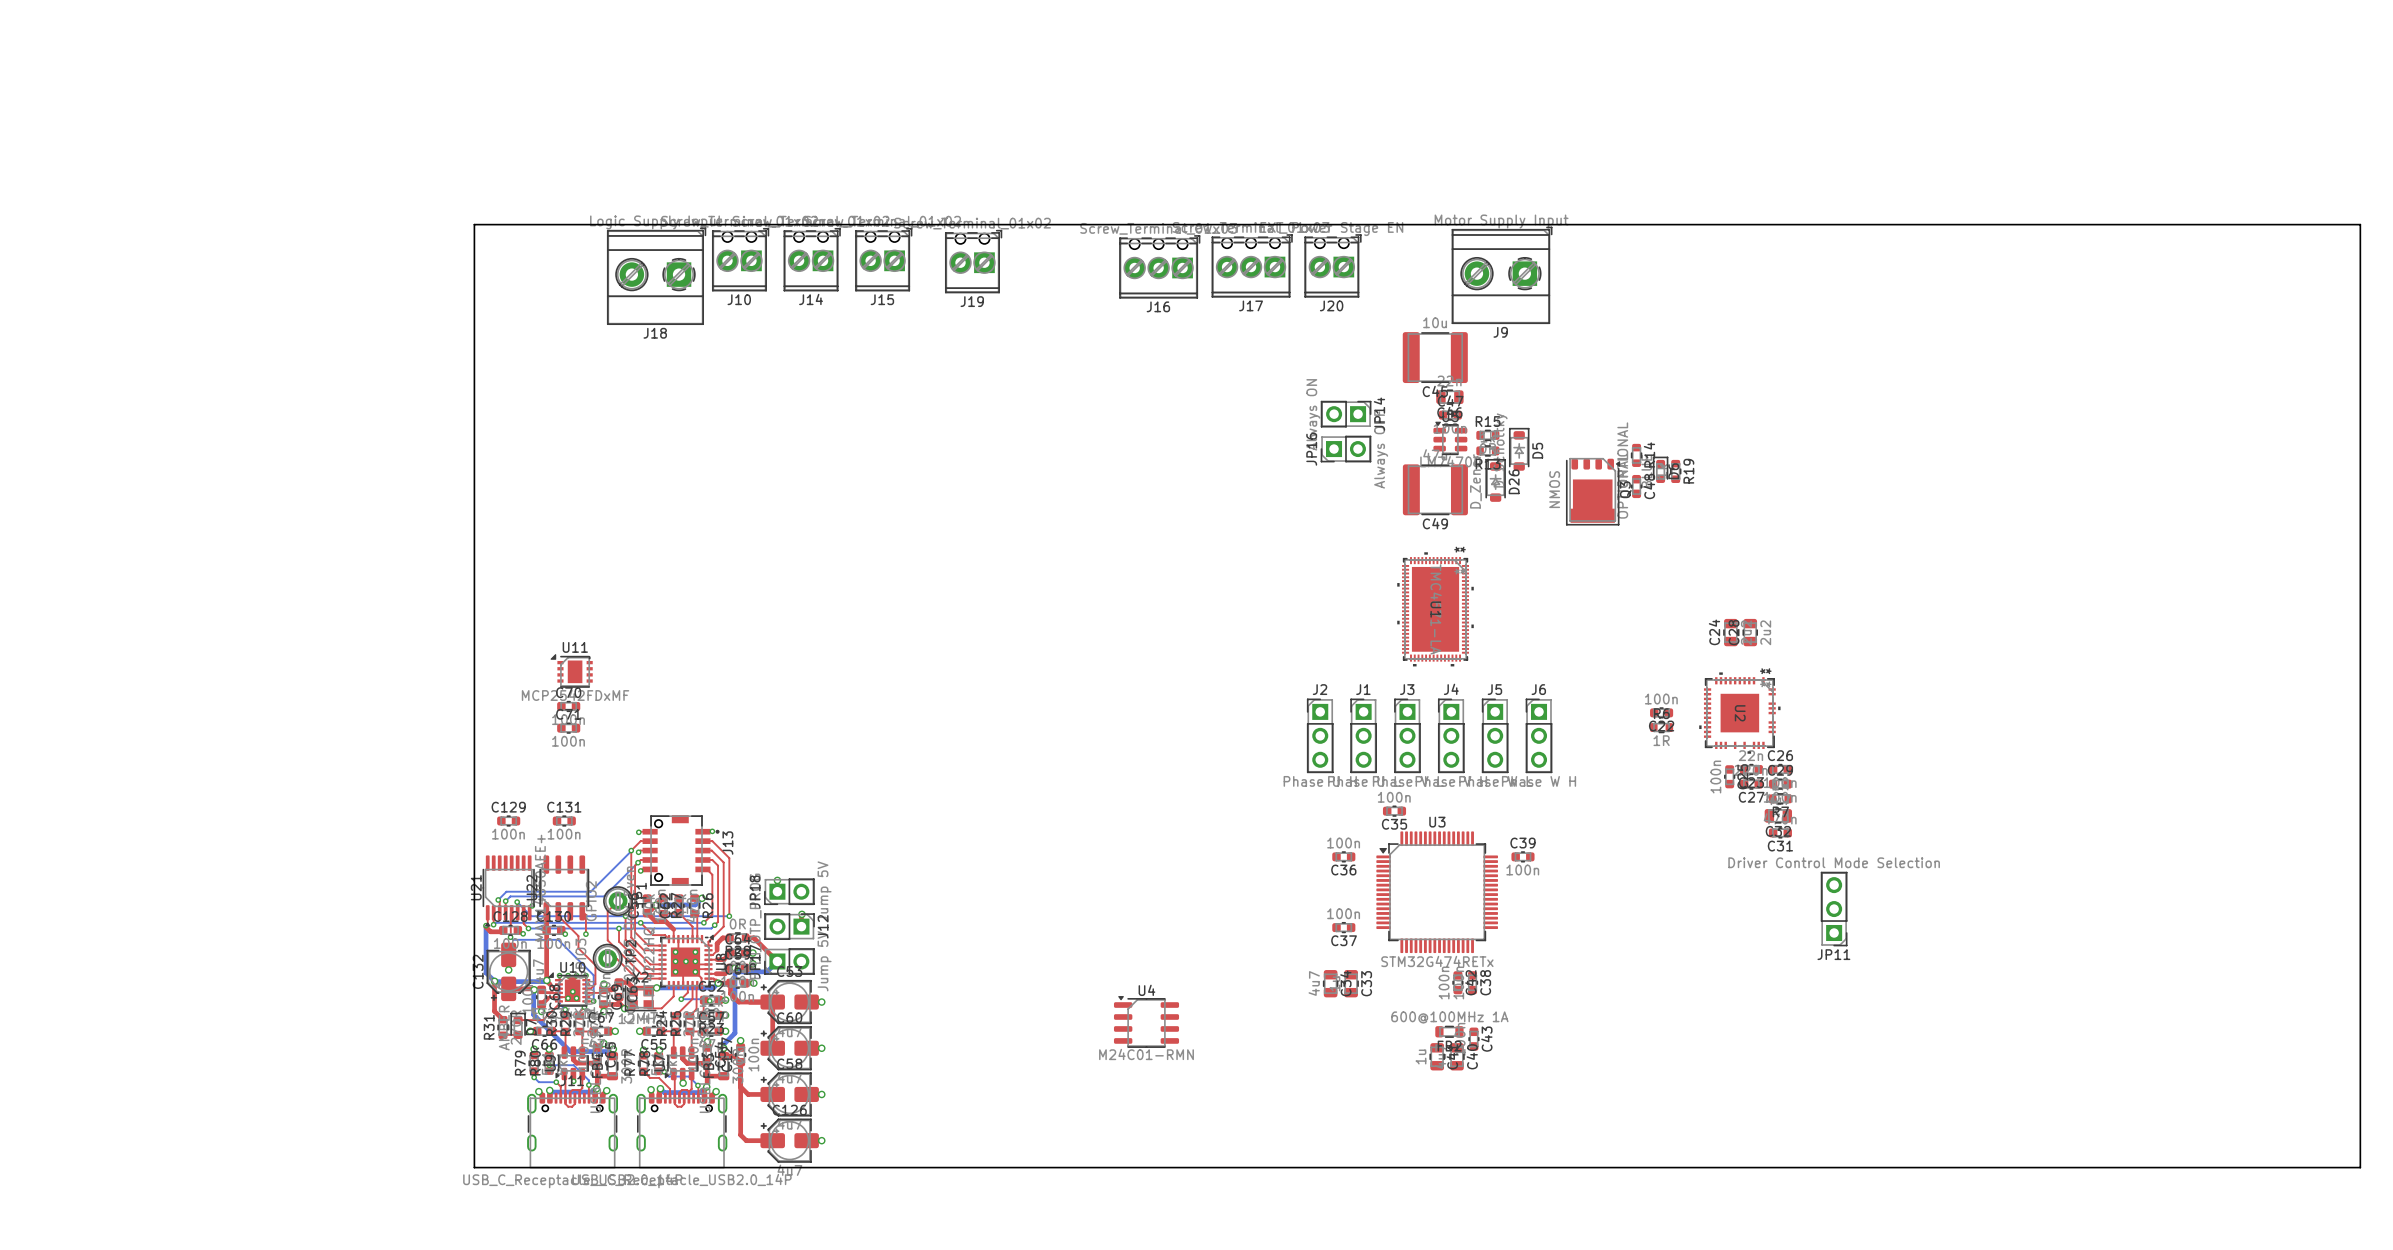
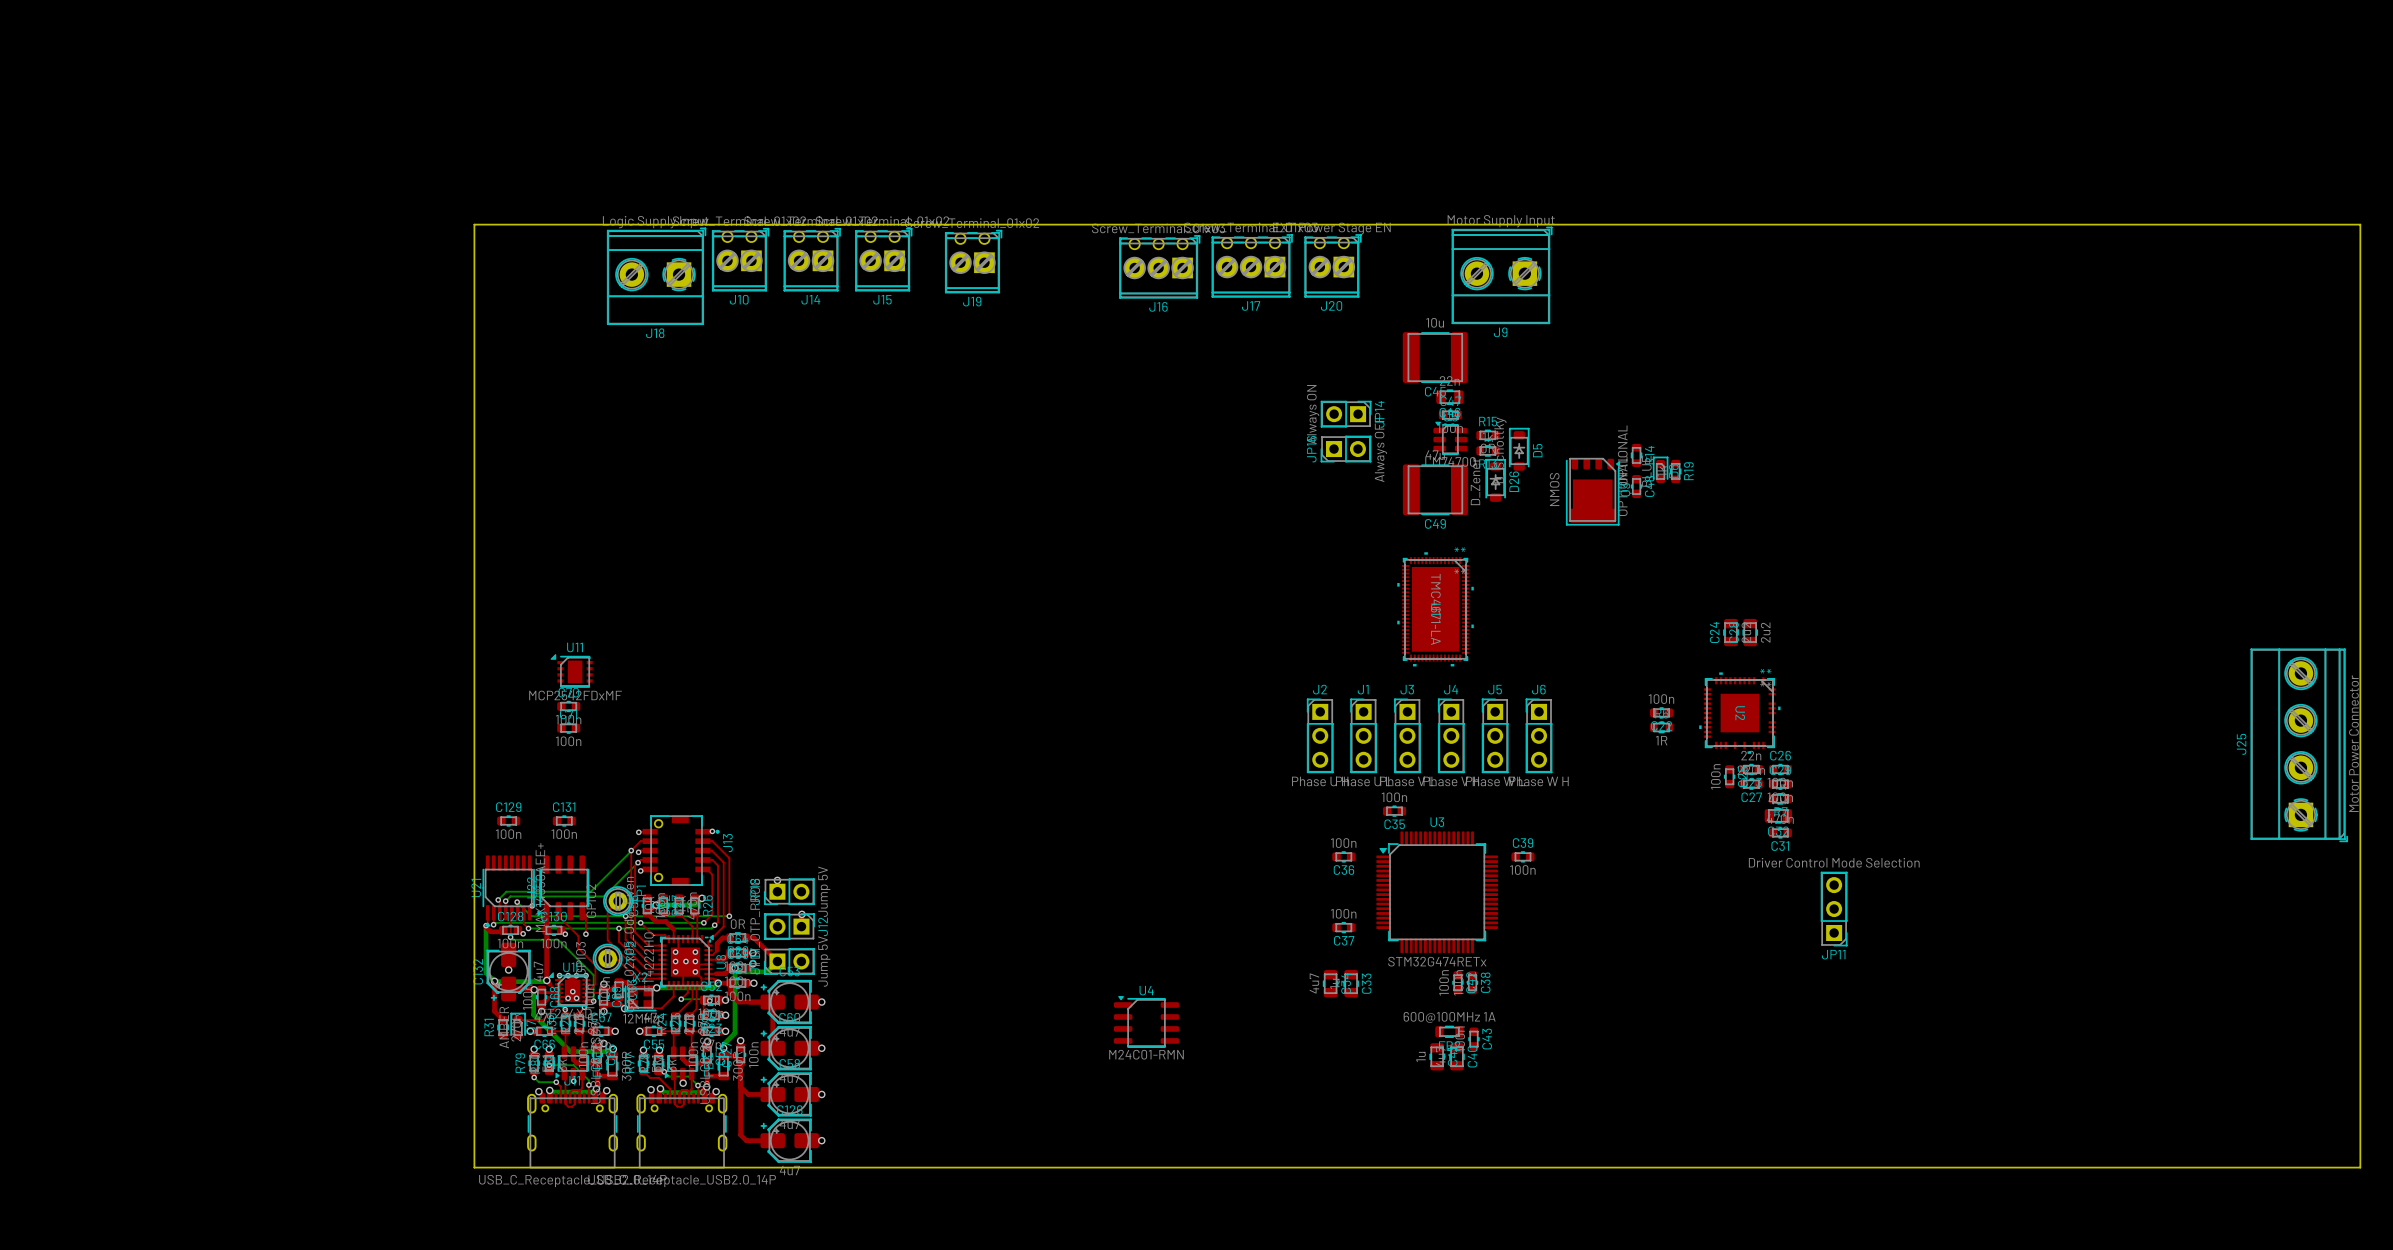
J25: none -> Motor Power Connector (2299, 745)

